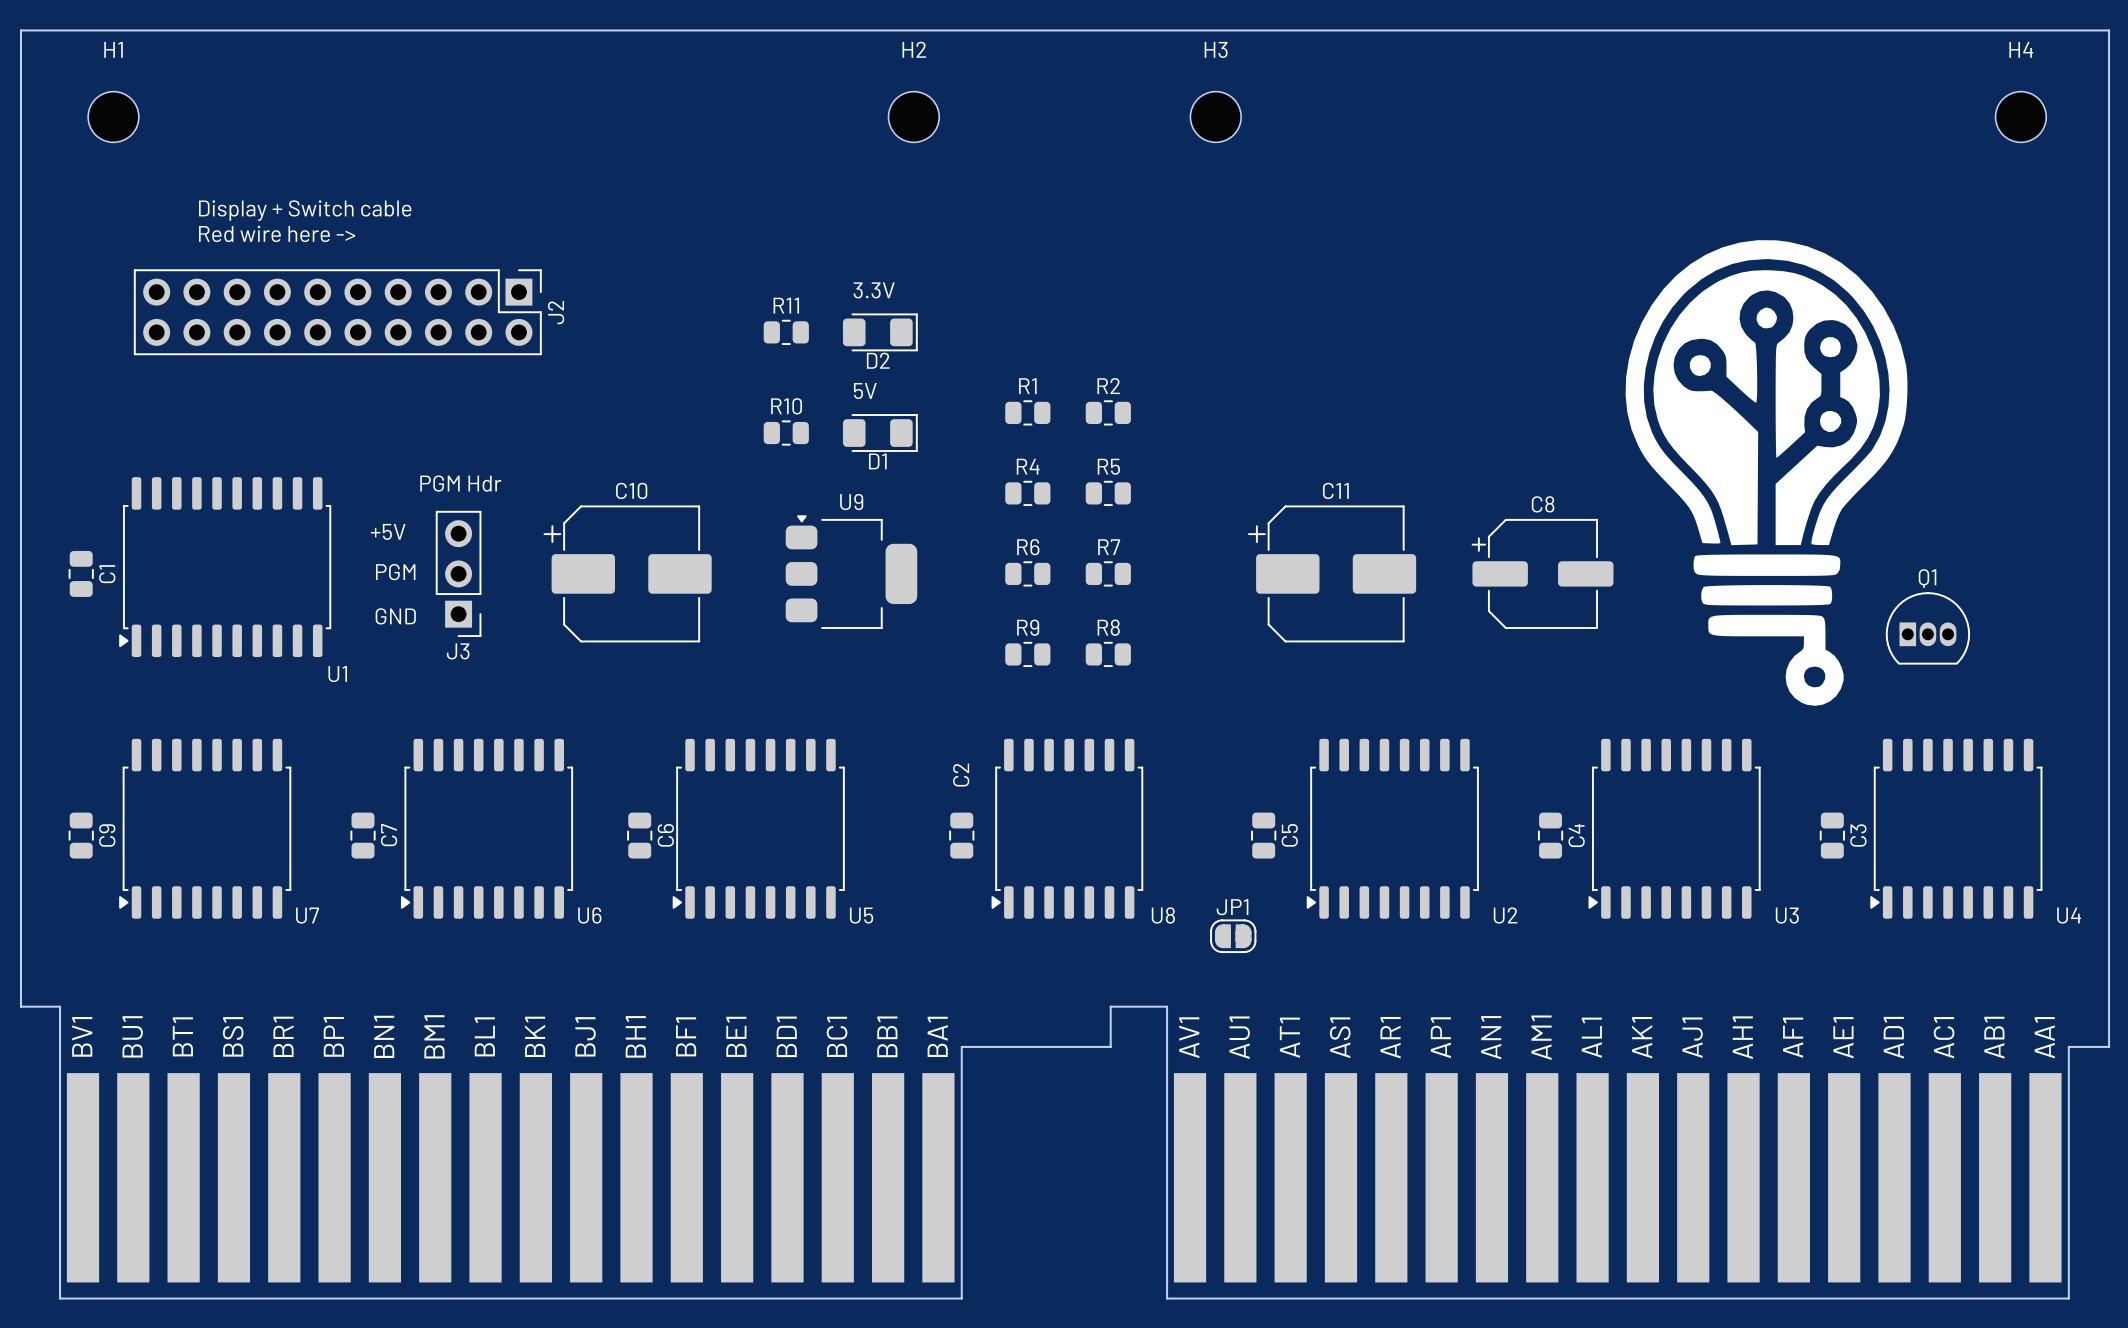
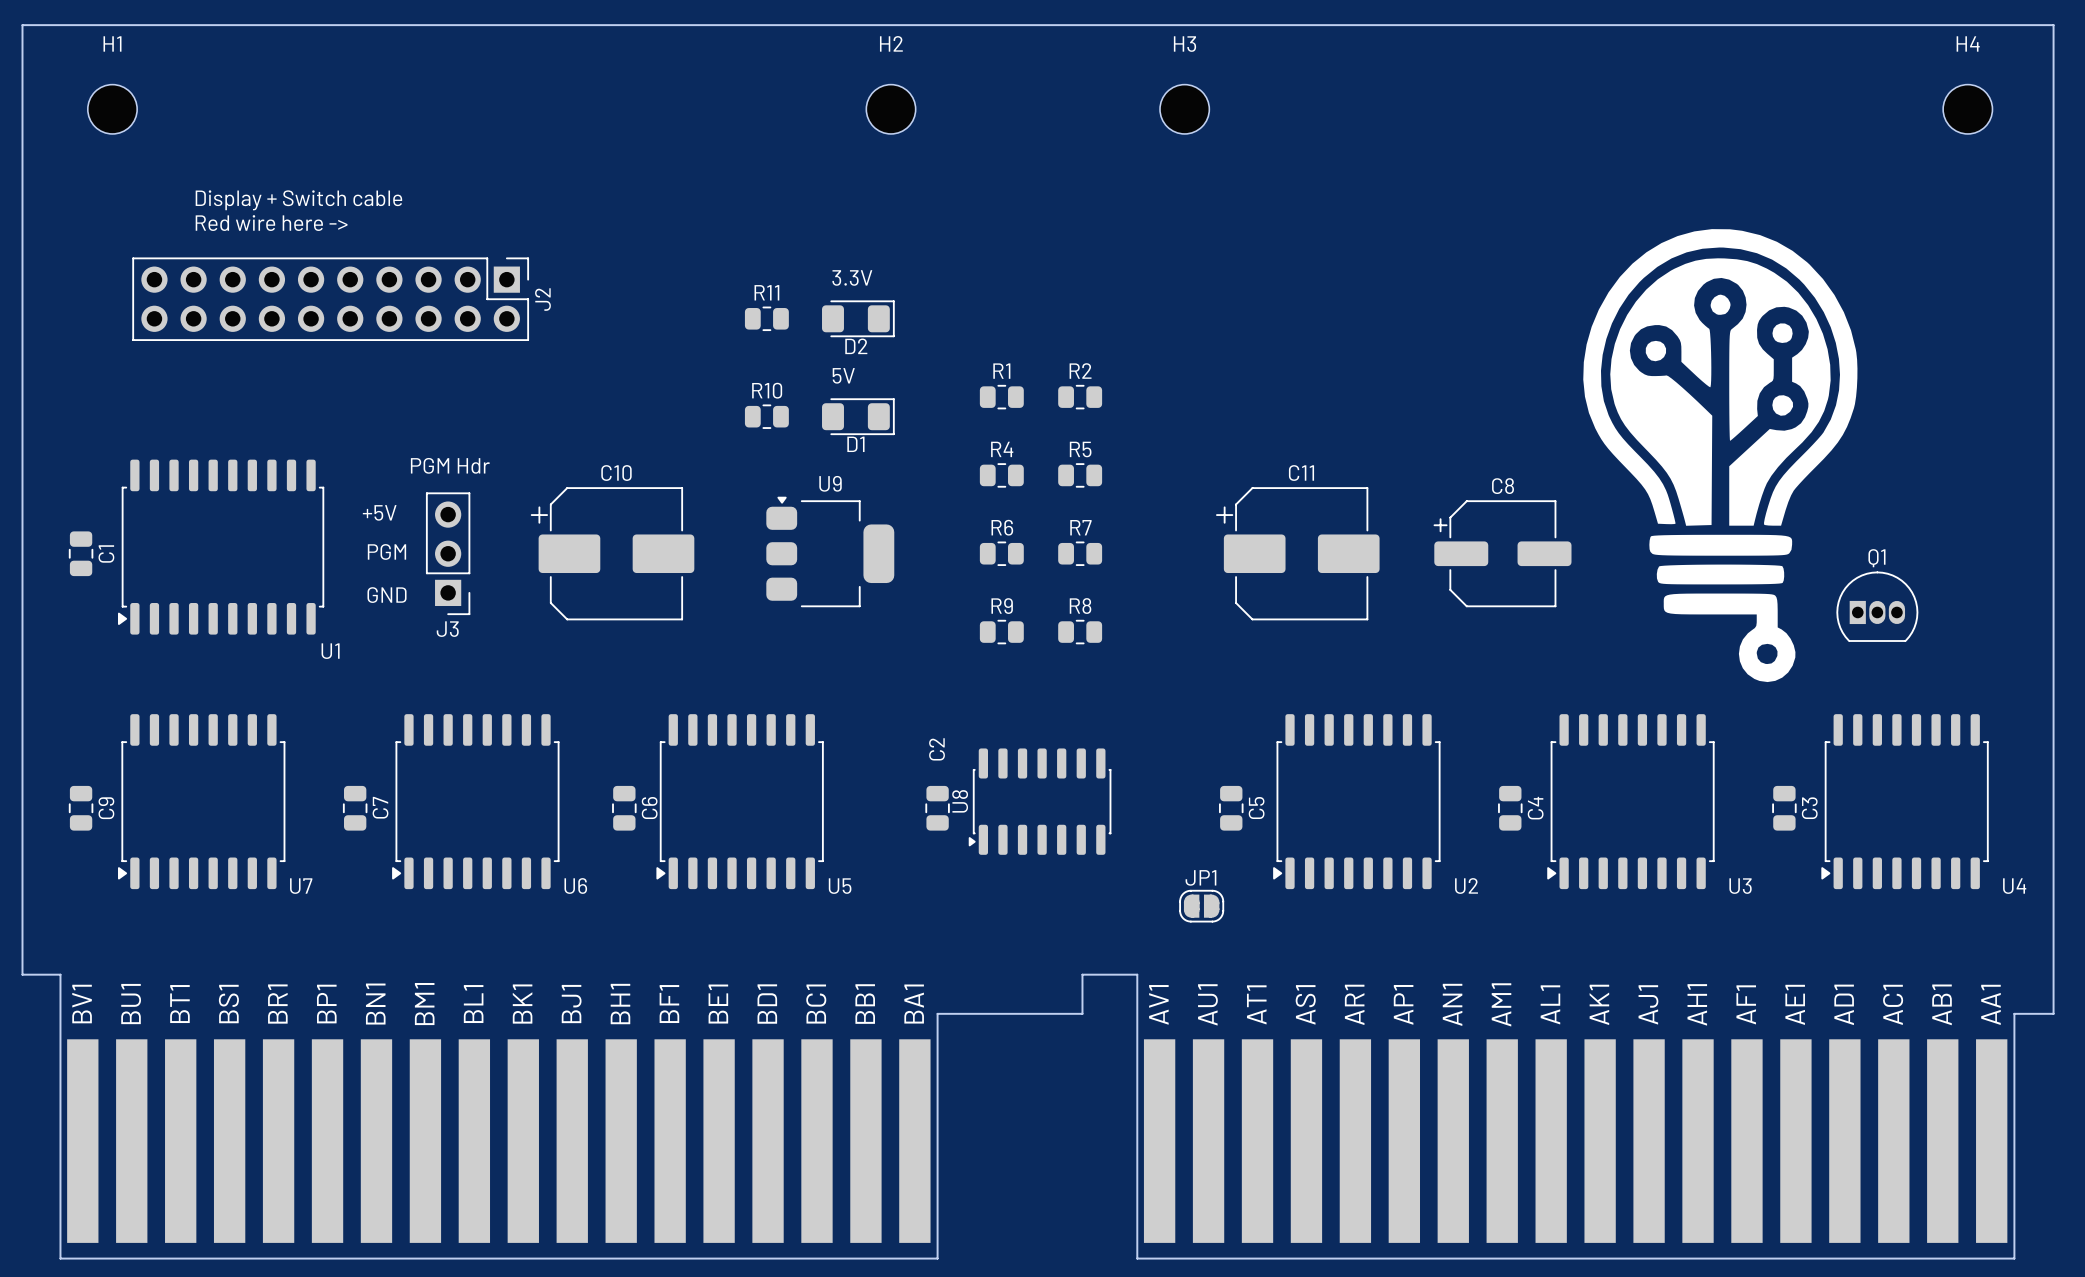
U8 footprint: [991, 738, 1144, 919] -> [968, 748, 1112, 855]
U8 name position: U8 (1163, 915) -> U8 (960, 801)

